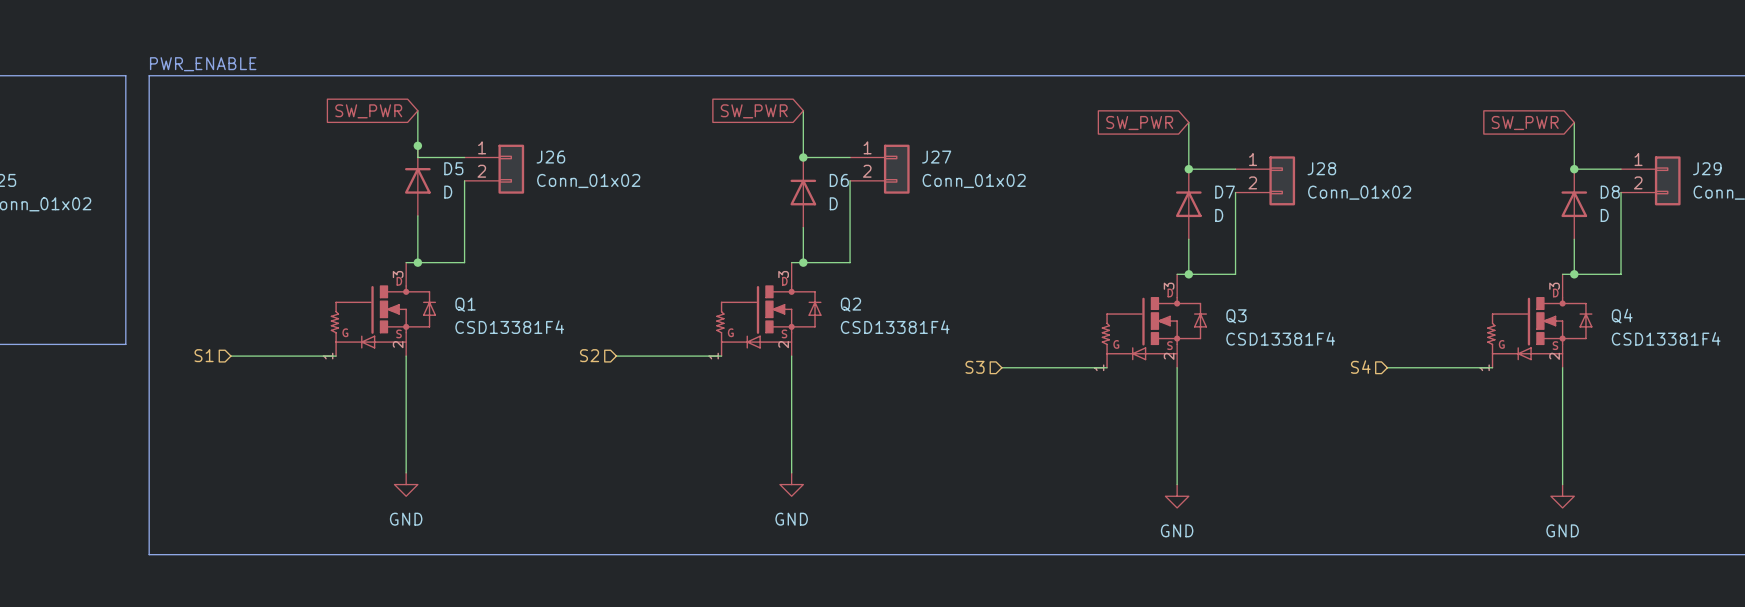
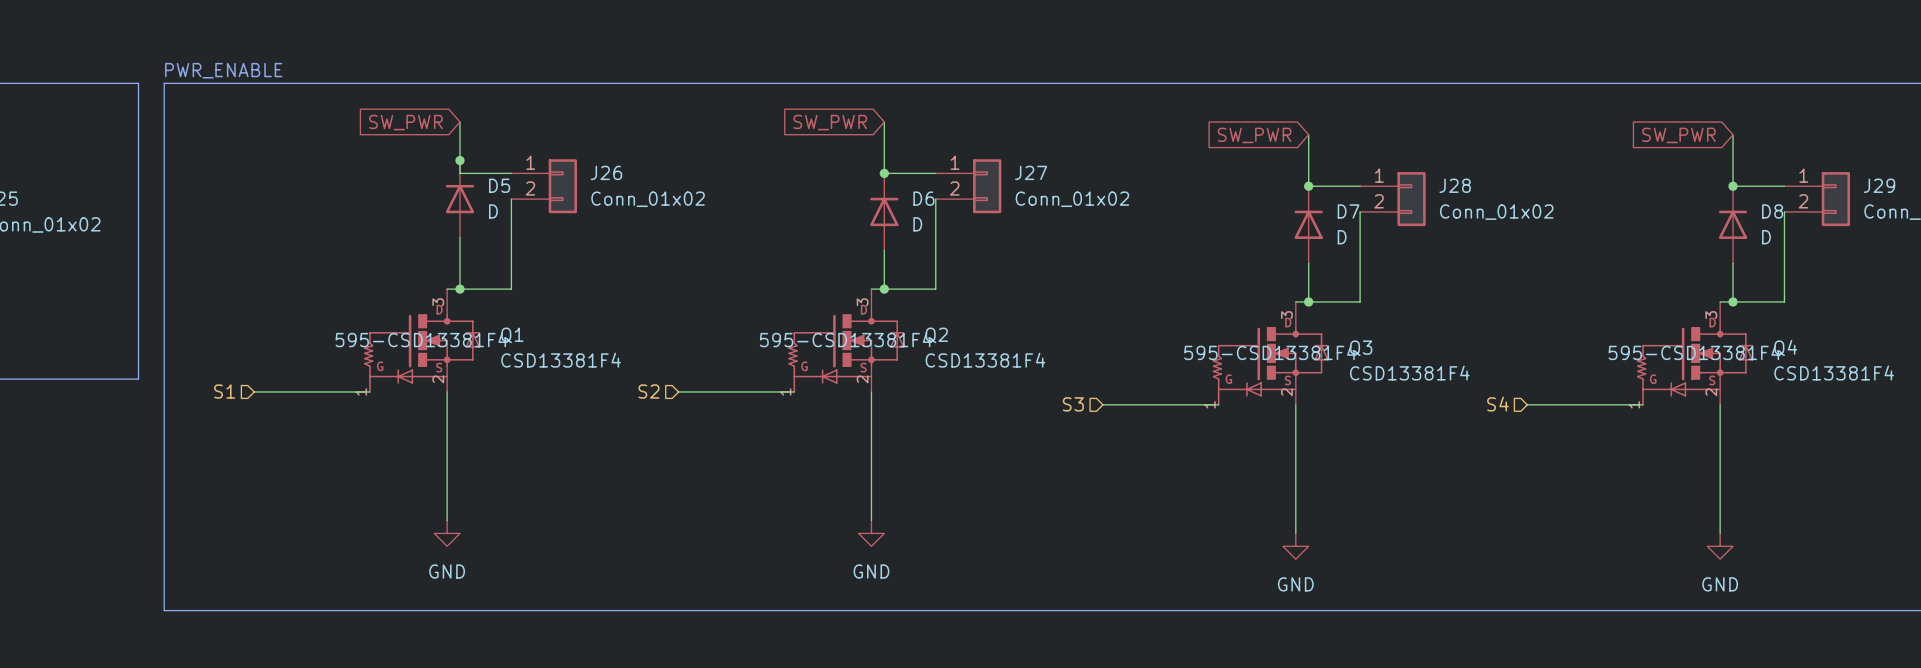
Q1 text: none -> 595-CSD13381F4 (421, 339)
Q2 text: none -> 595-CSD13381F4 (846, 339)
Q3 text: none -> 595-CSD13381F4 (1270, 352)
Q4 text: none -> 595-CSD13381F4 (1694, 352)

